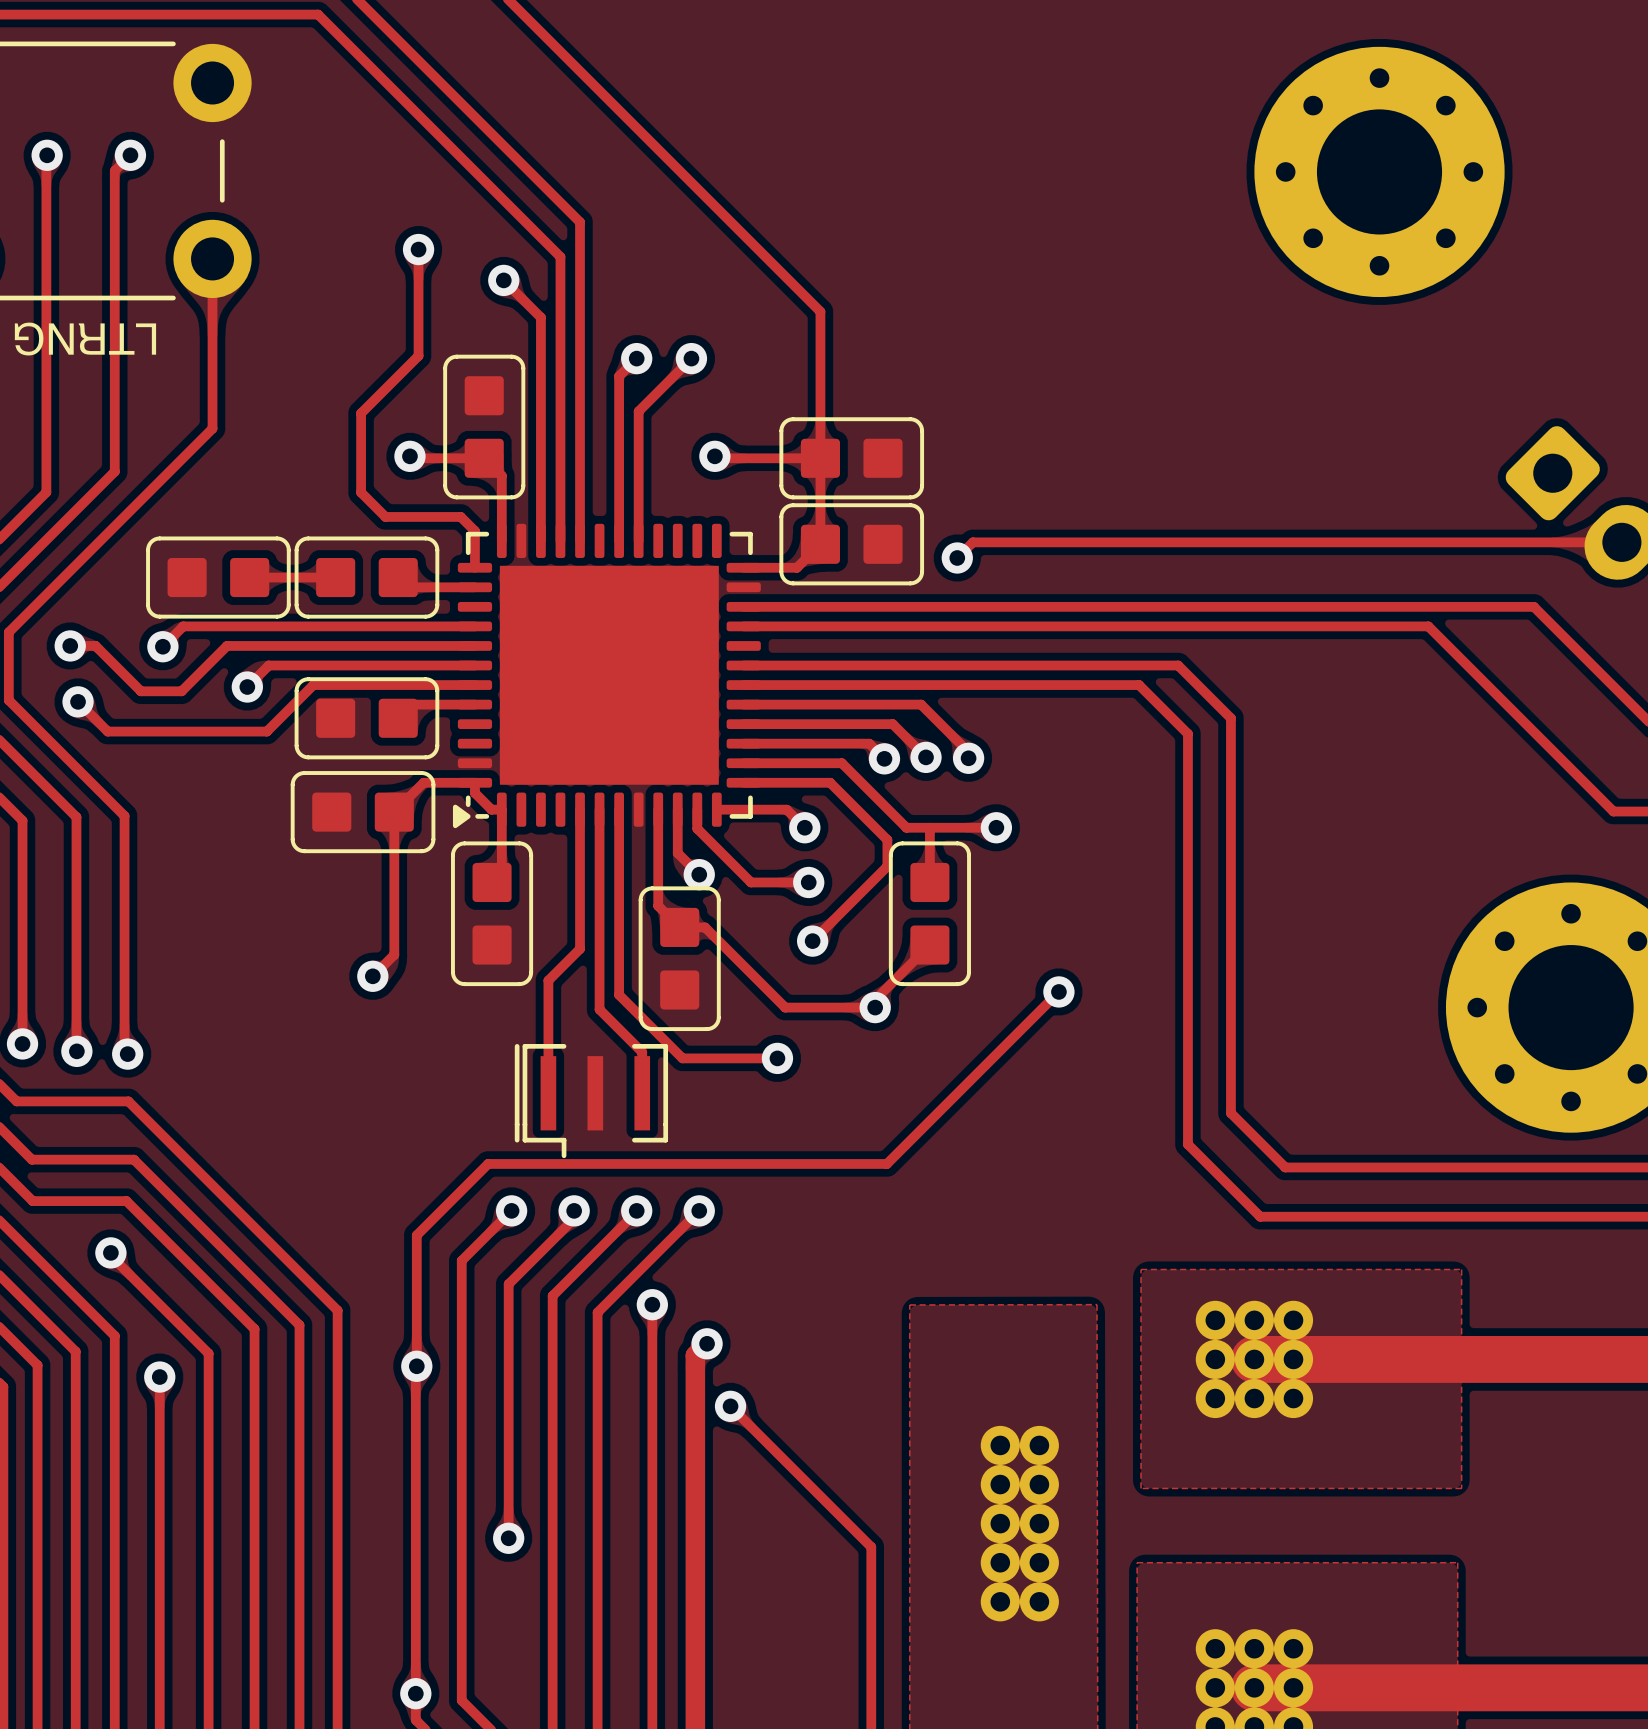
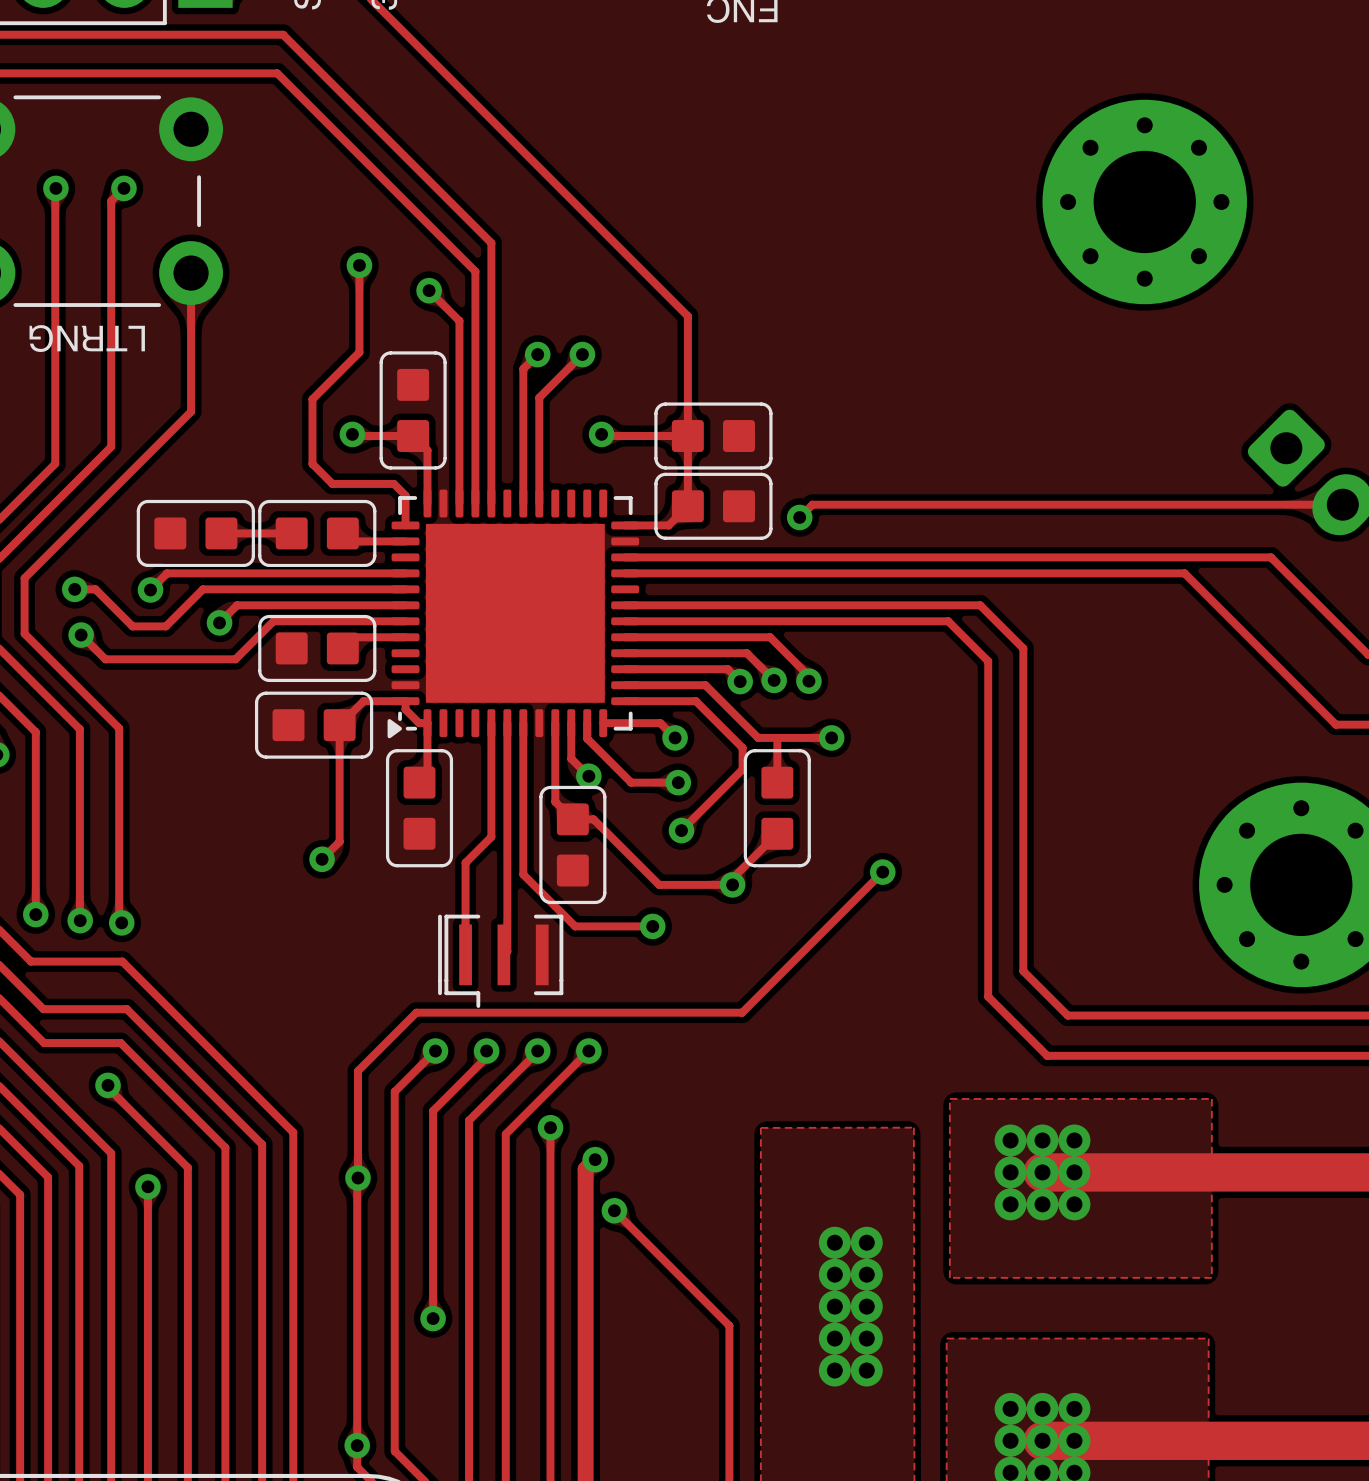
track: (599, 1009) (642, 1052) (642, 1093) -> (507, 886) (507, 951) (503, 954)

